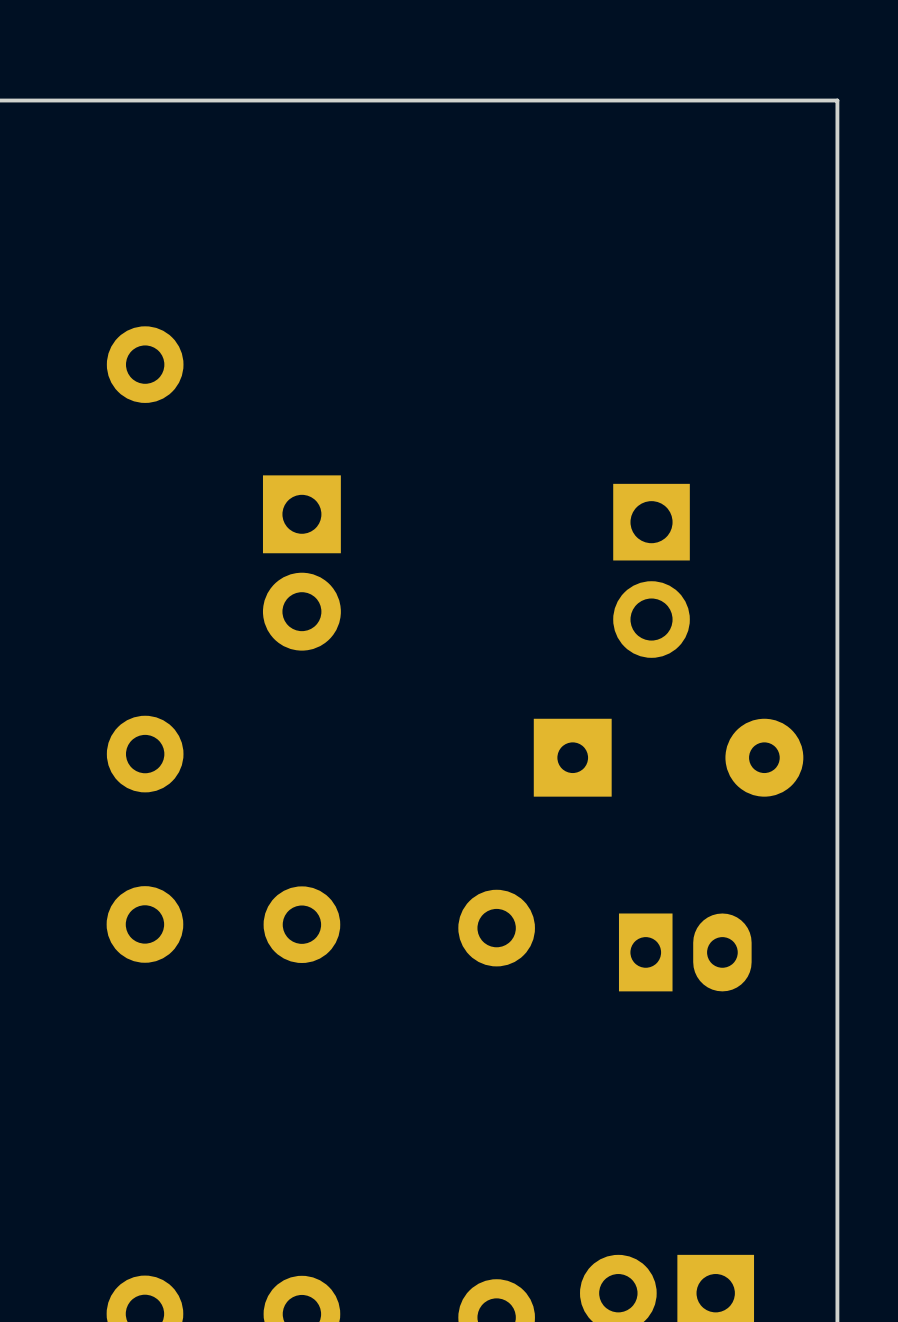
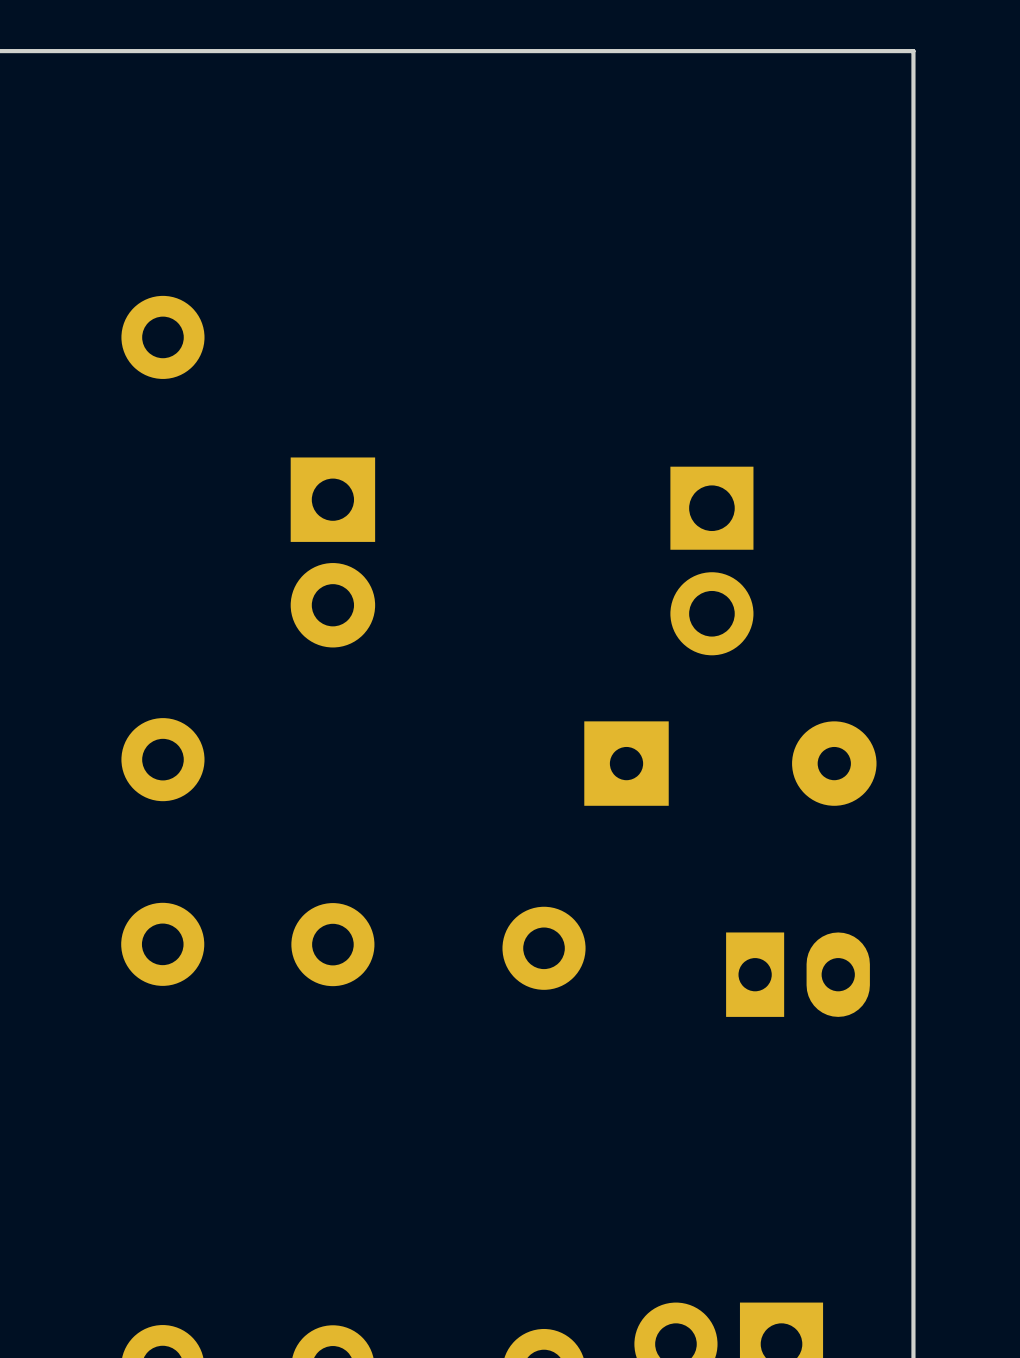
part position: (685, 952) -> (798, 974)

